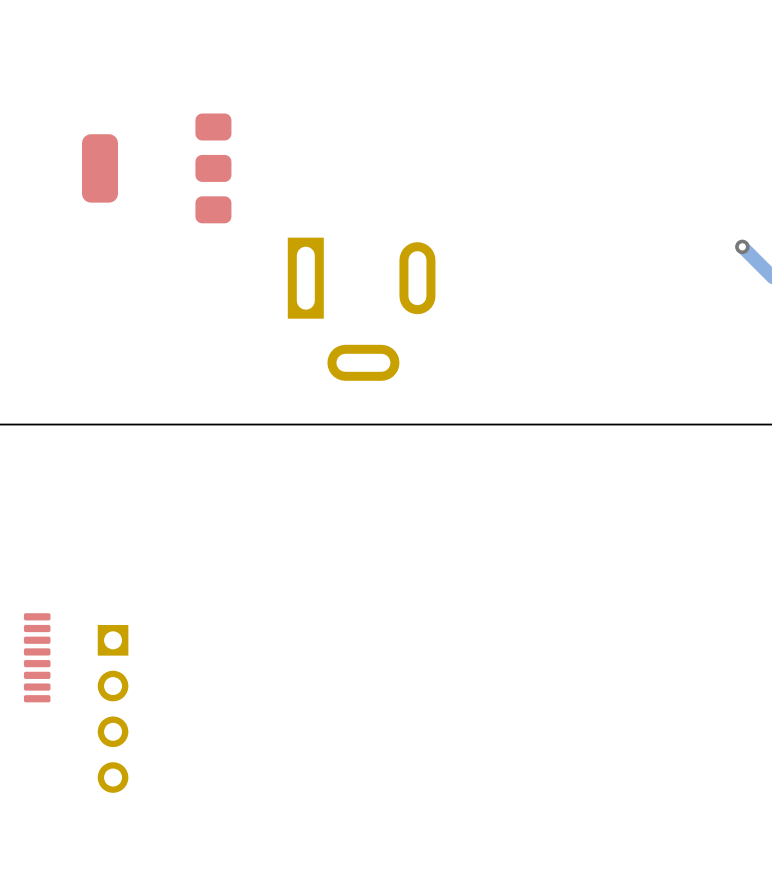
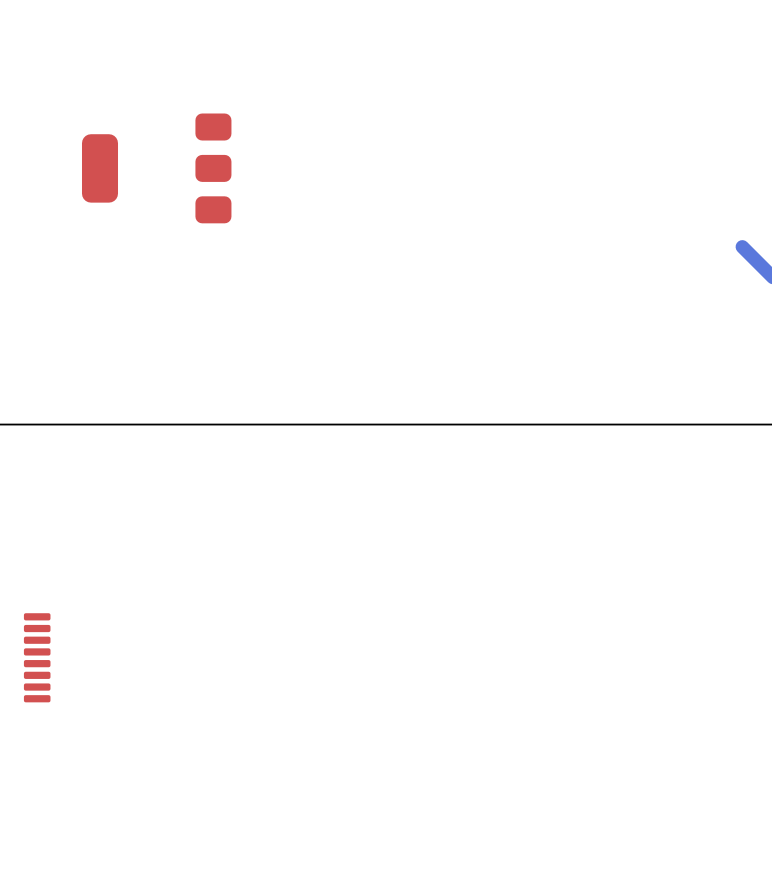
via: (742, 246) -> none
part: (361, 309) -> none
part: (113, 708) -> none

